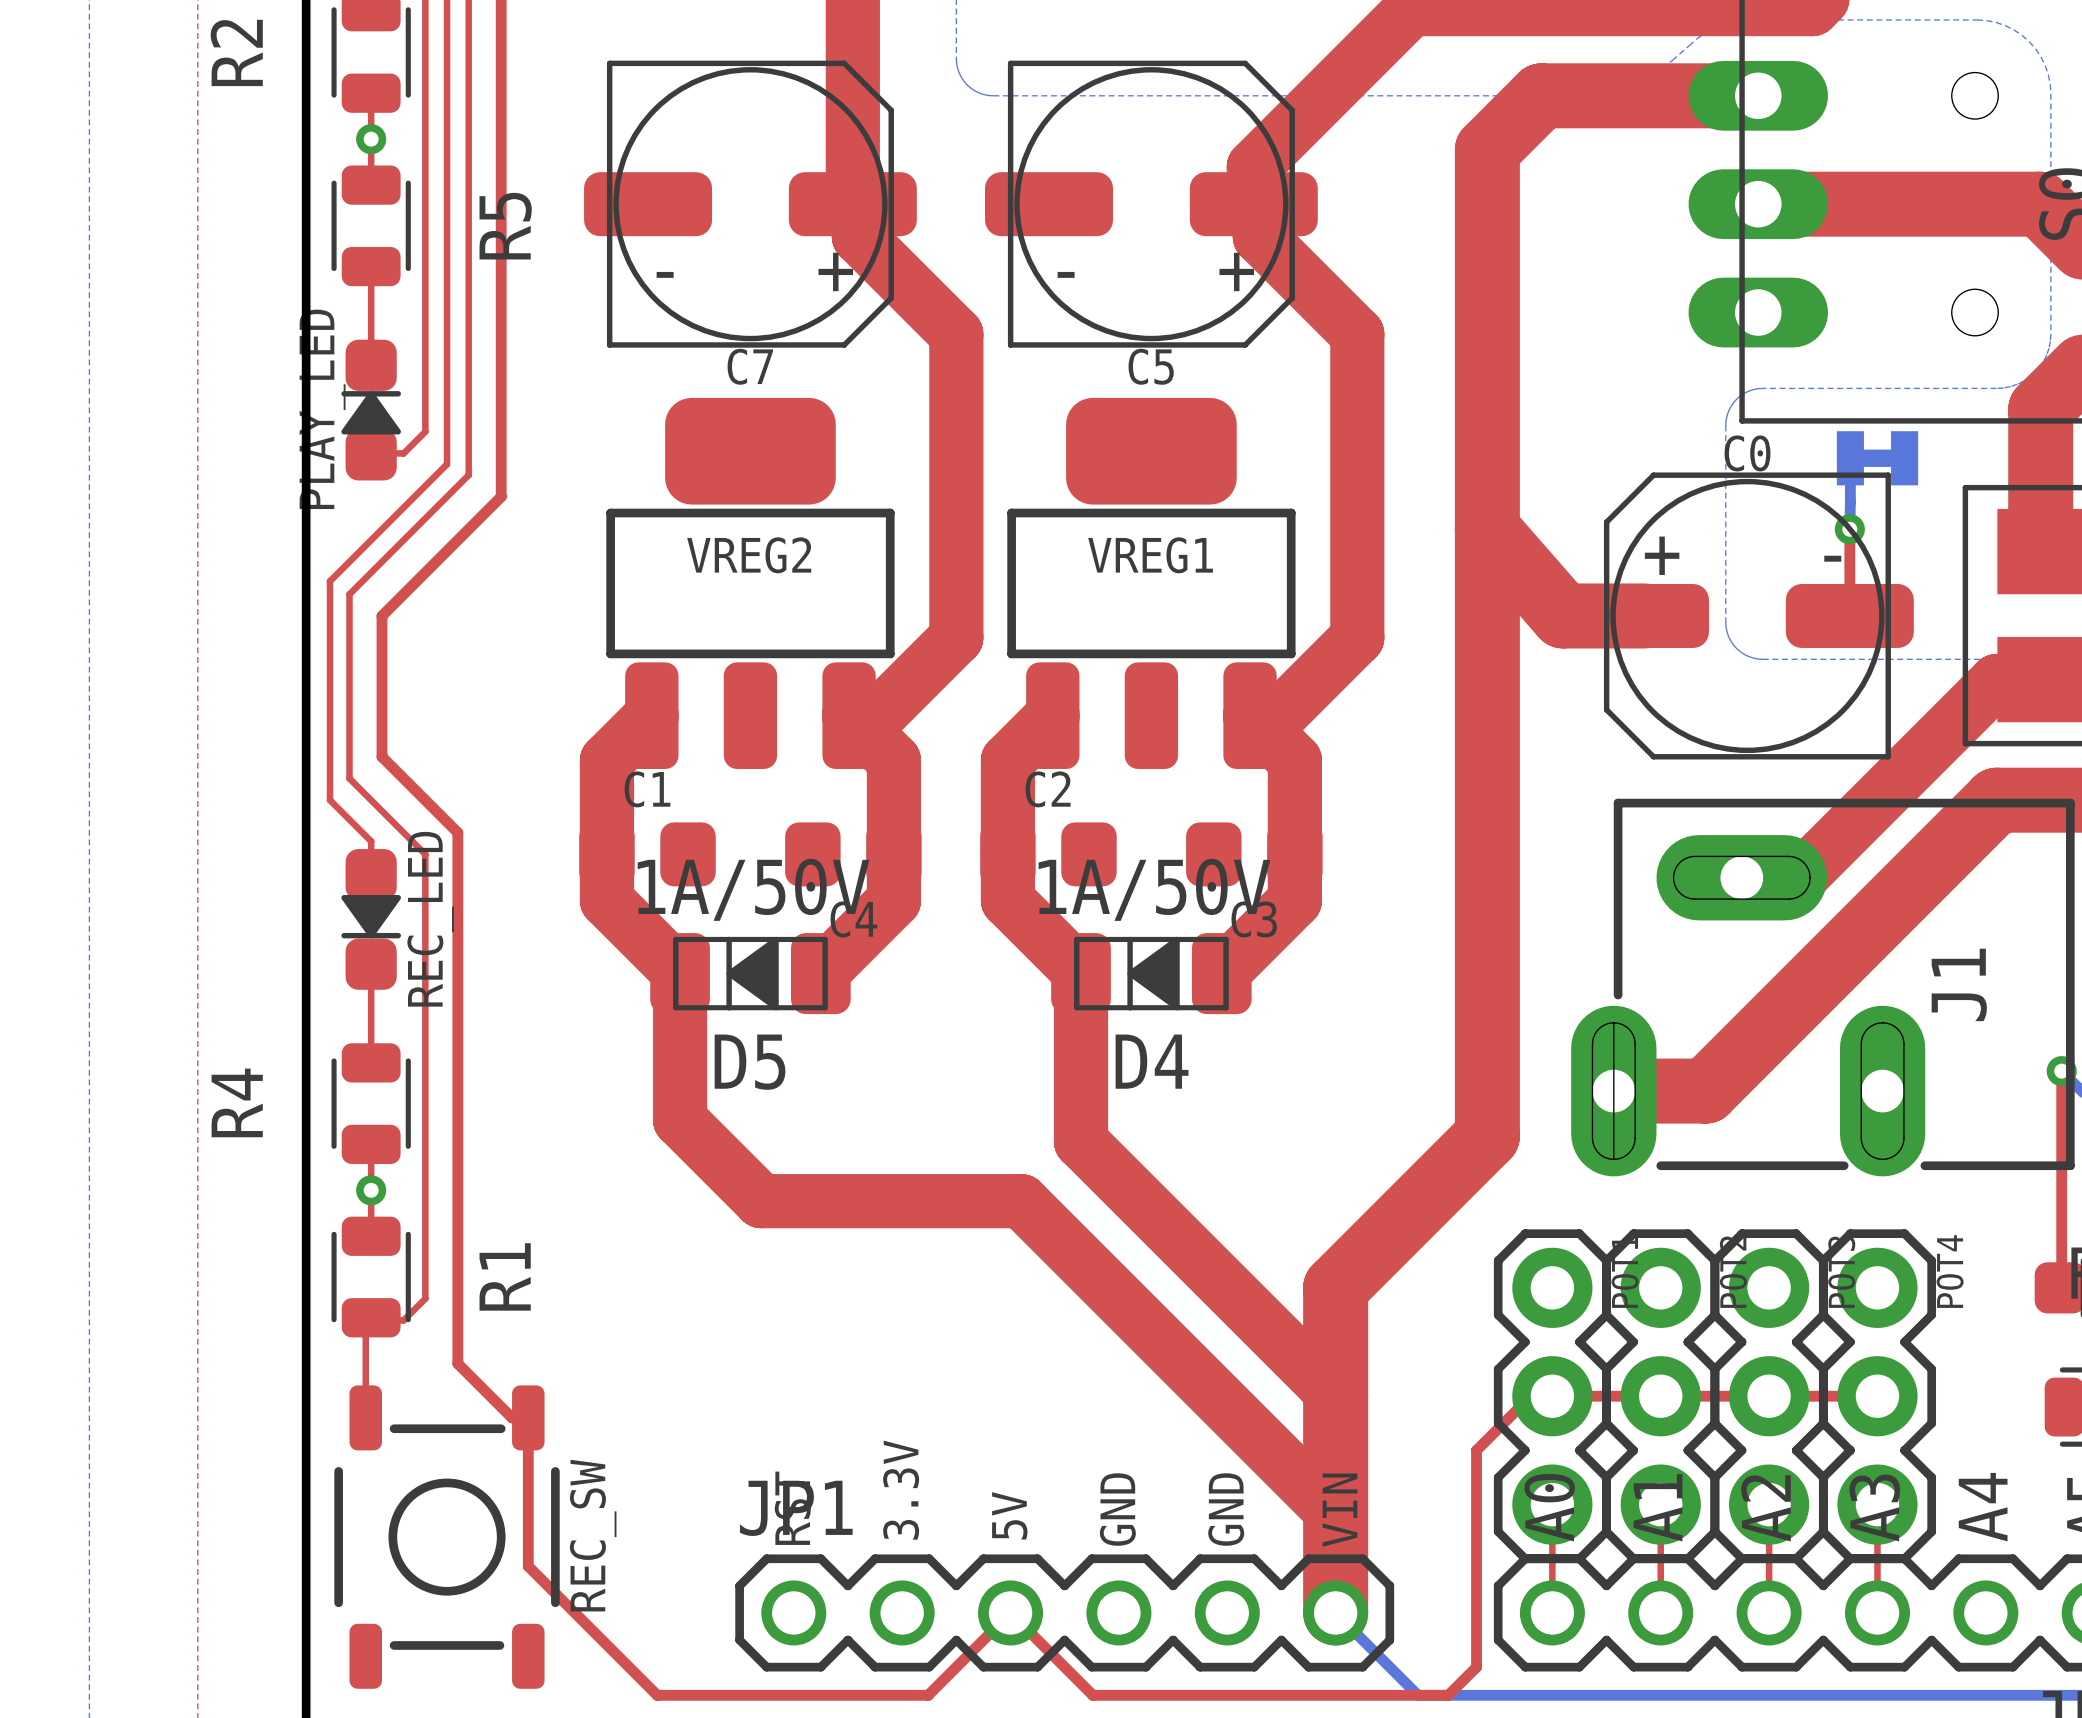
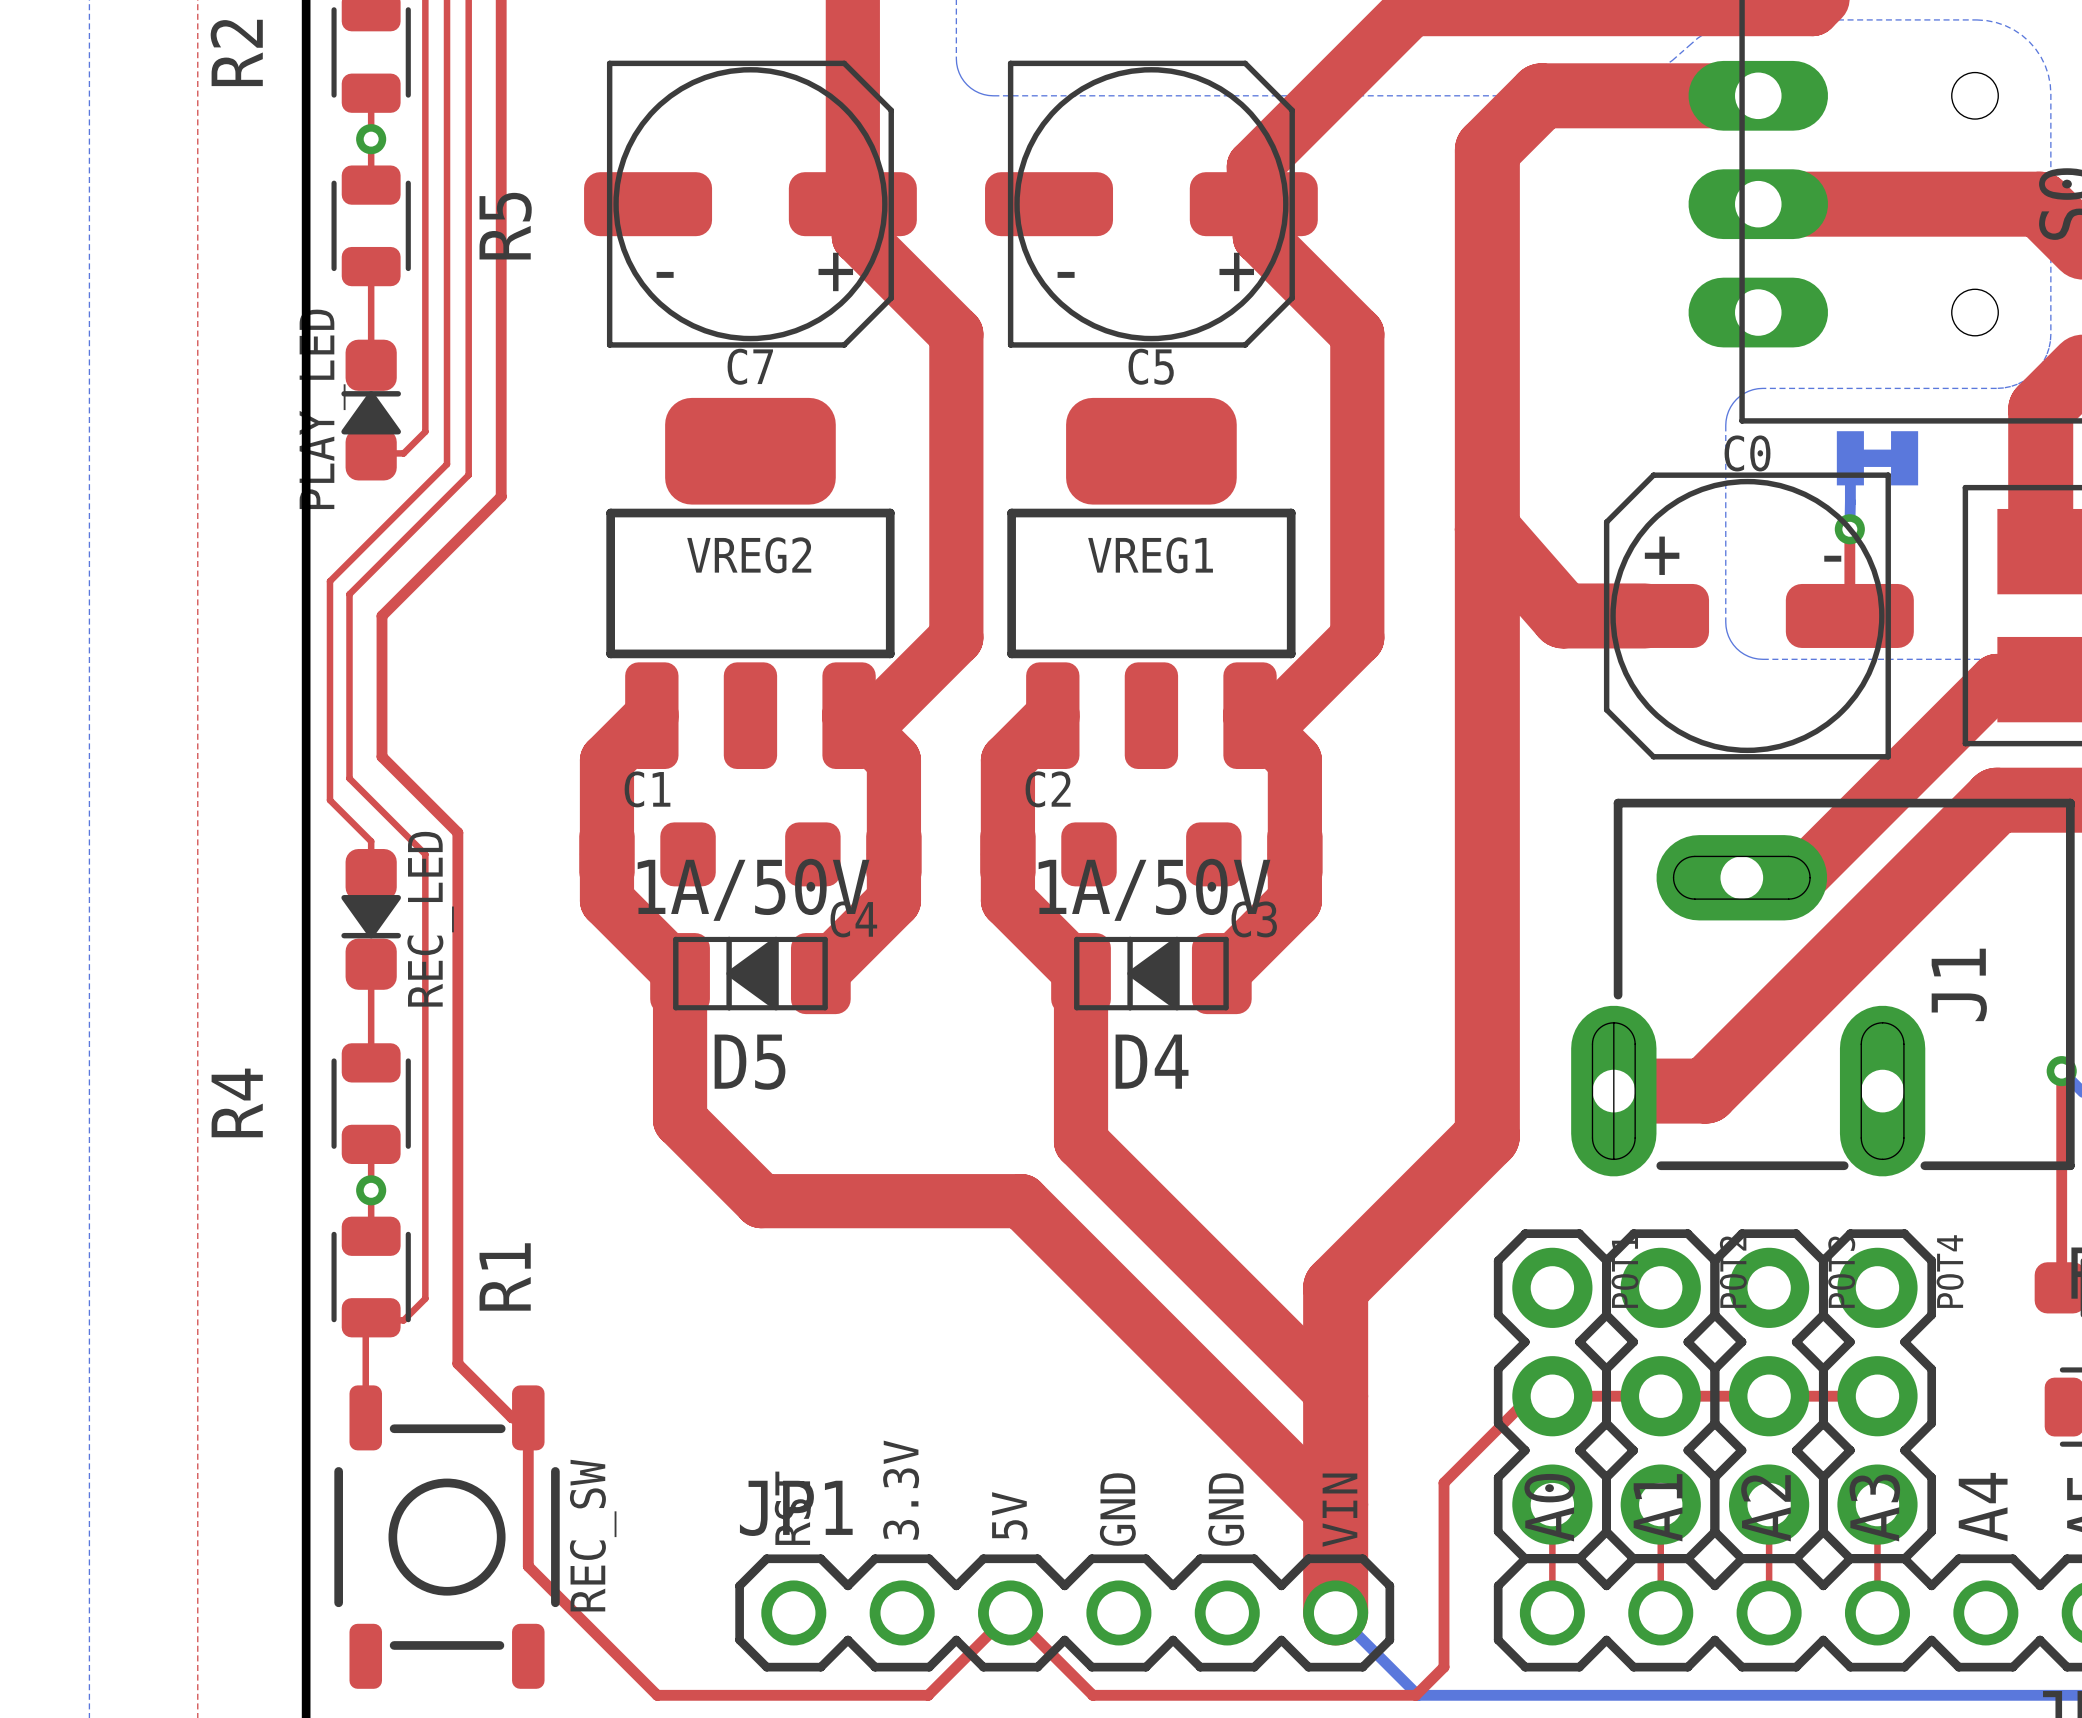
top track: (1476, 1450) (1476, 1667) (1448, 1695) (1415, 1695) -> (1476, 1450) (1444, 1482) (1444, 1667) (1415, 1695)

